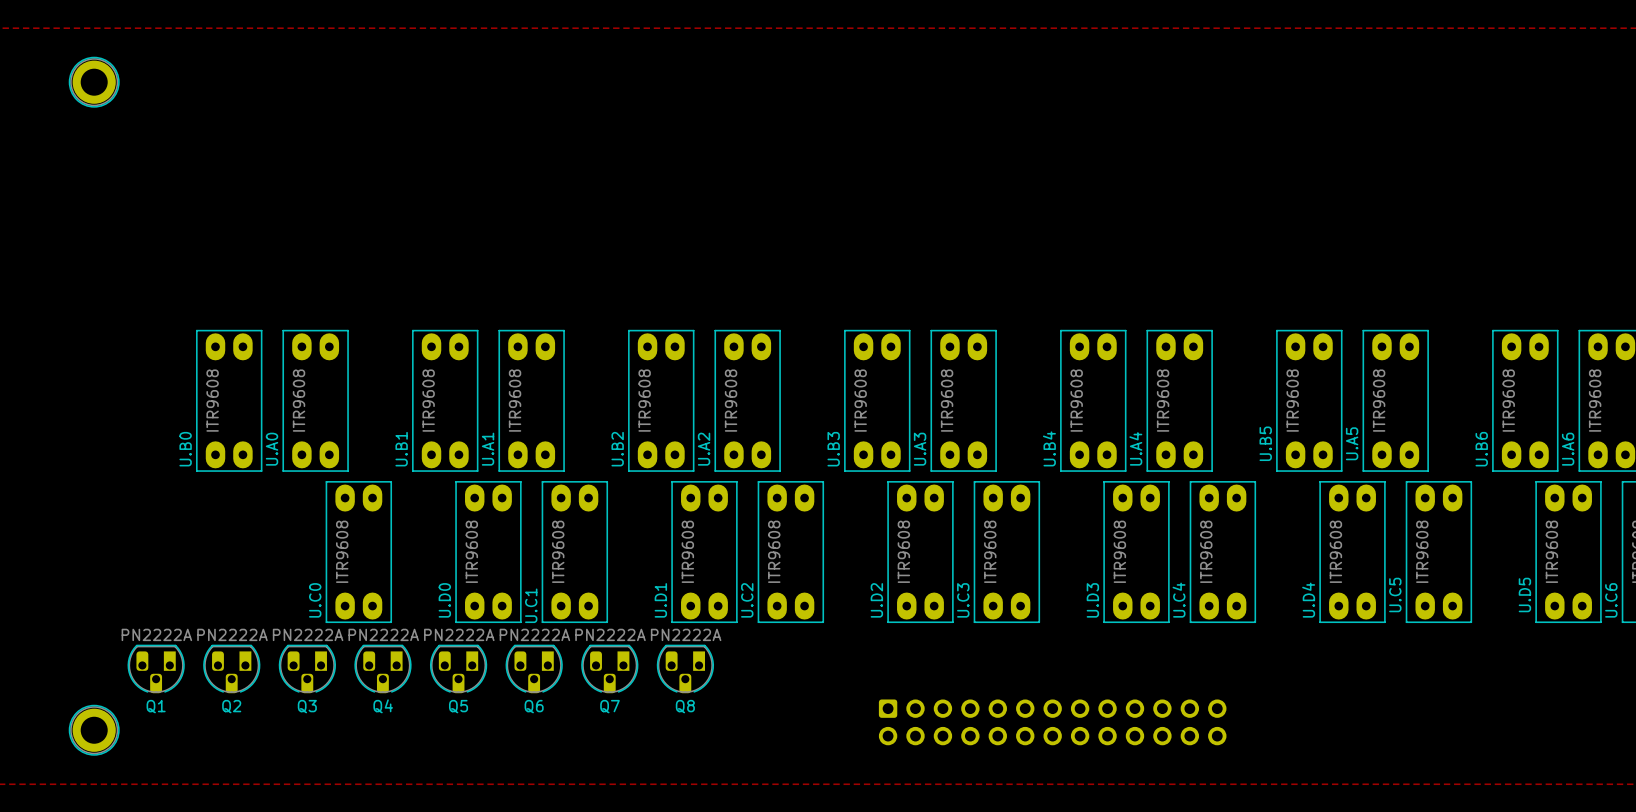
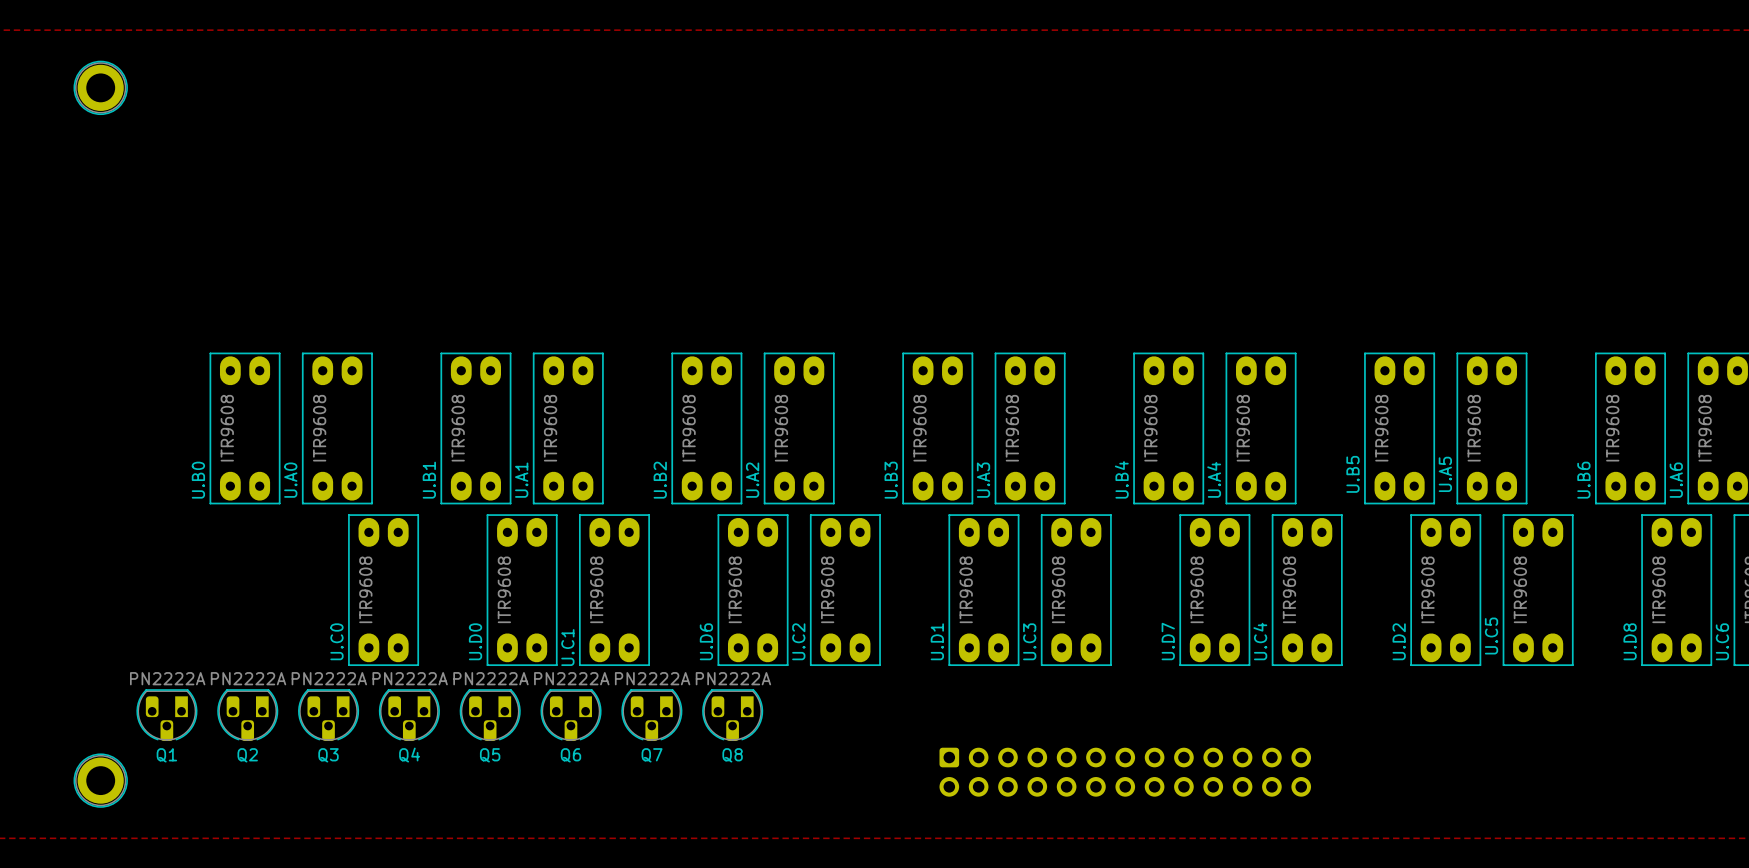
U.D5 name: U.D5 (1524, 594) -> U.D8 (1630, 641)
U.D1 name: U.D1 (660, 600) -> U.D6 (706, 641)
U.D2 name: U.D2 (876, 600) -> U.D1 (937, 641)
U.D3 name: U.D3 (1092, 600) -> U.D7 (1168, 641)
U.D4 name: U.D4 (1308, 600) -> U.D2 (1399, 641)

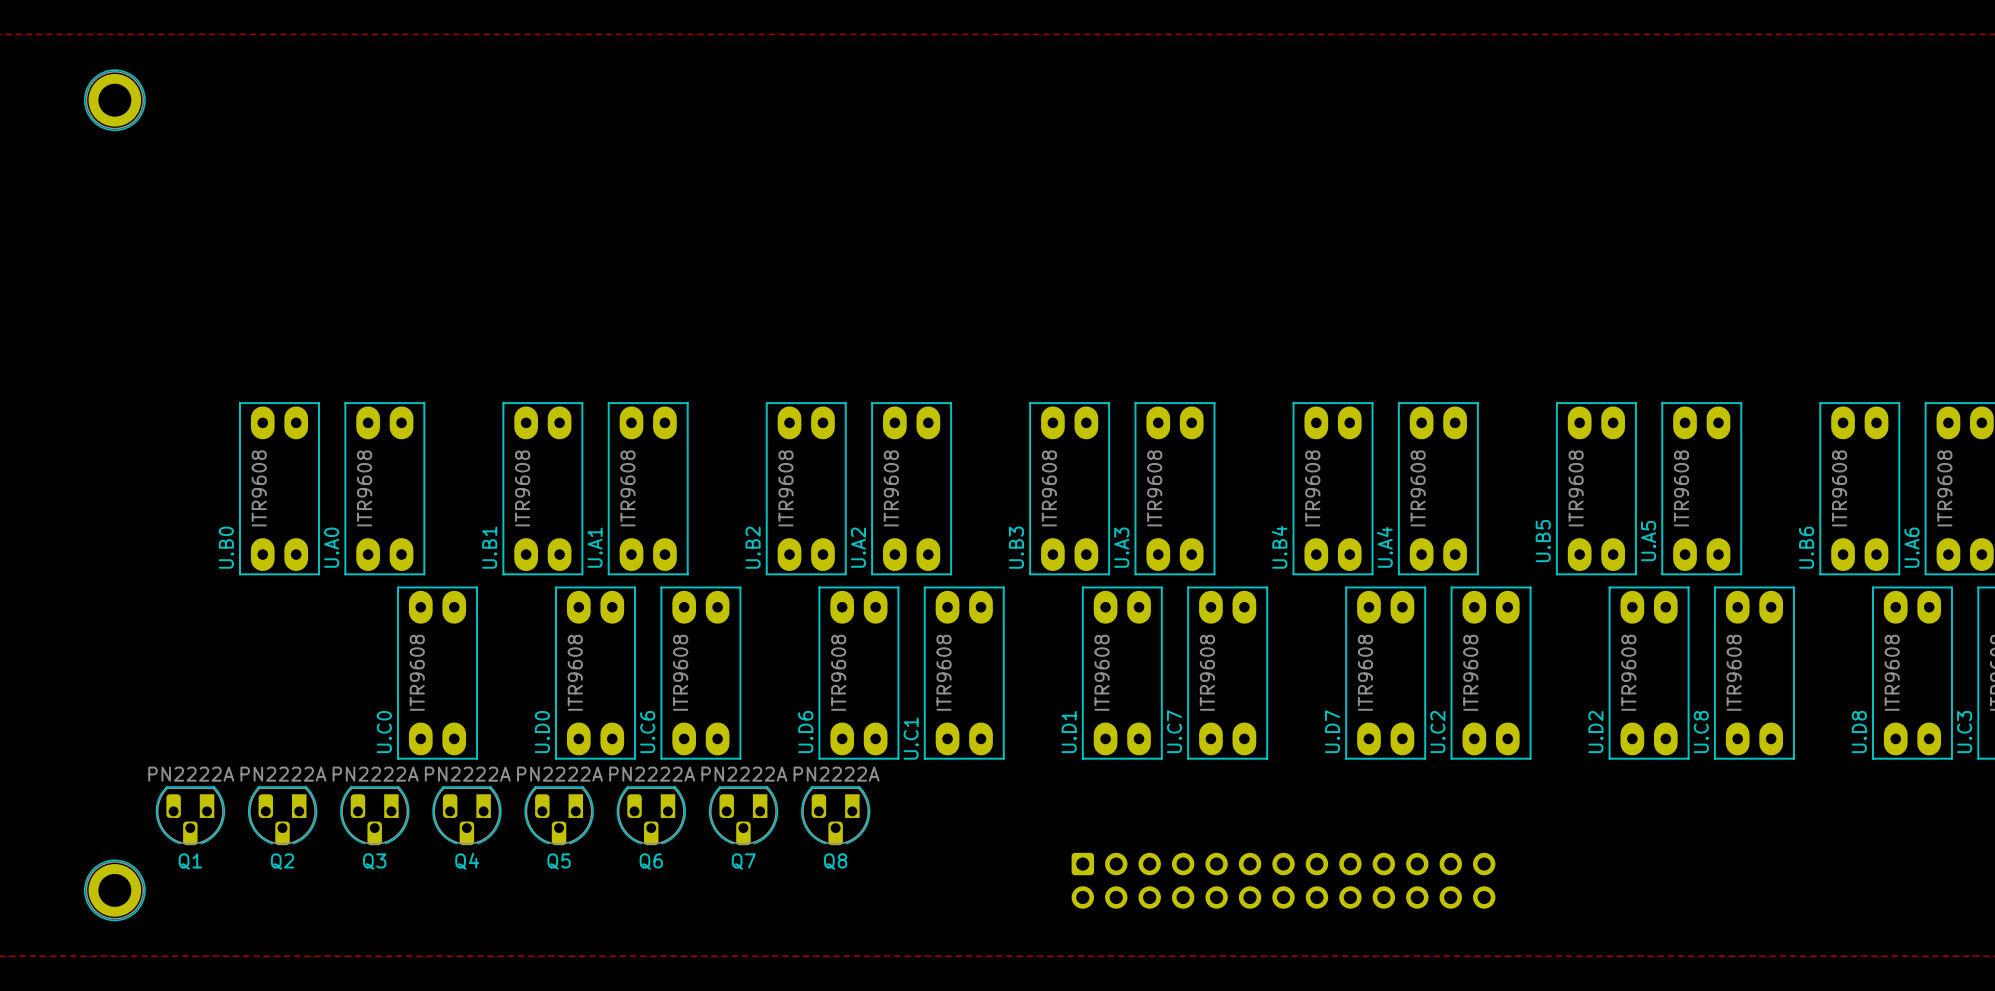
U.C5 name: U.C5 (1491, 636) -> U.C8 (1701, 732)
U.C2 name: U.C2 (798, 641) -> U.C1 (911, 738)
U.C3 name: U.C3 (1029, 641) -> U.C7 (1174, 731)
U.C4 name: U.C4 (1260, 641) -> U.C2 (1437, 732)
U.C6 name: U.C6 (1722, 641) -> U.C3 (1964, 732)
U.C1 name: U.C1 (567, 647) -> U.C6 (647, 732)

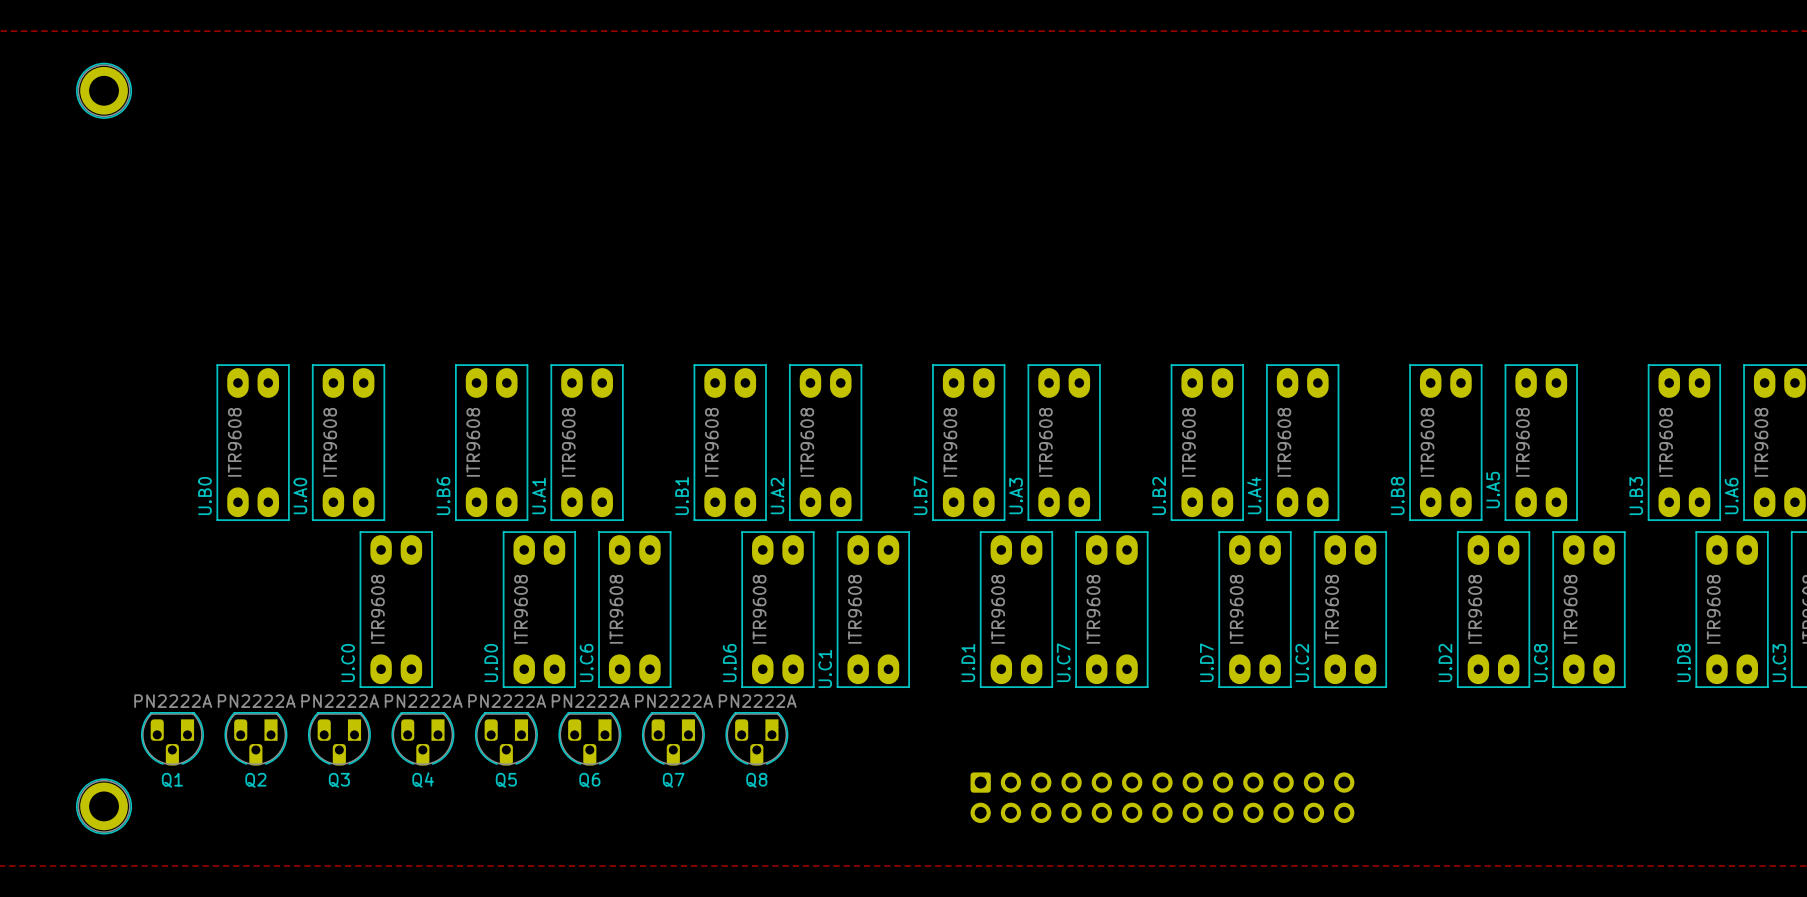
U.B5 name: U.B5 (1543, 541) -> U.B8 (1397, 496)
U.B1 name: U.B1 (489, 547) -> U.B6 (443, 496)
U.B2 name: U.B2 (753, 547) -> U.B1 (682, 496)
U.B3 name: U.B3 (1016, 547) -> U.B7 (920, 495)
U.B4 name: U.B4 (1279, 547) -> U.B2 (1159, 496)
U.B6 name: U.B6 (1806, 547) -> U.B3 (1636, 496)

